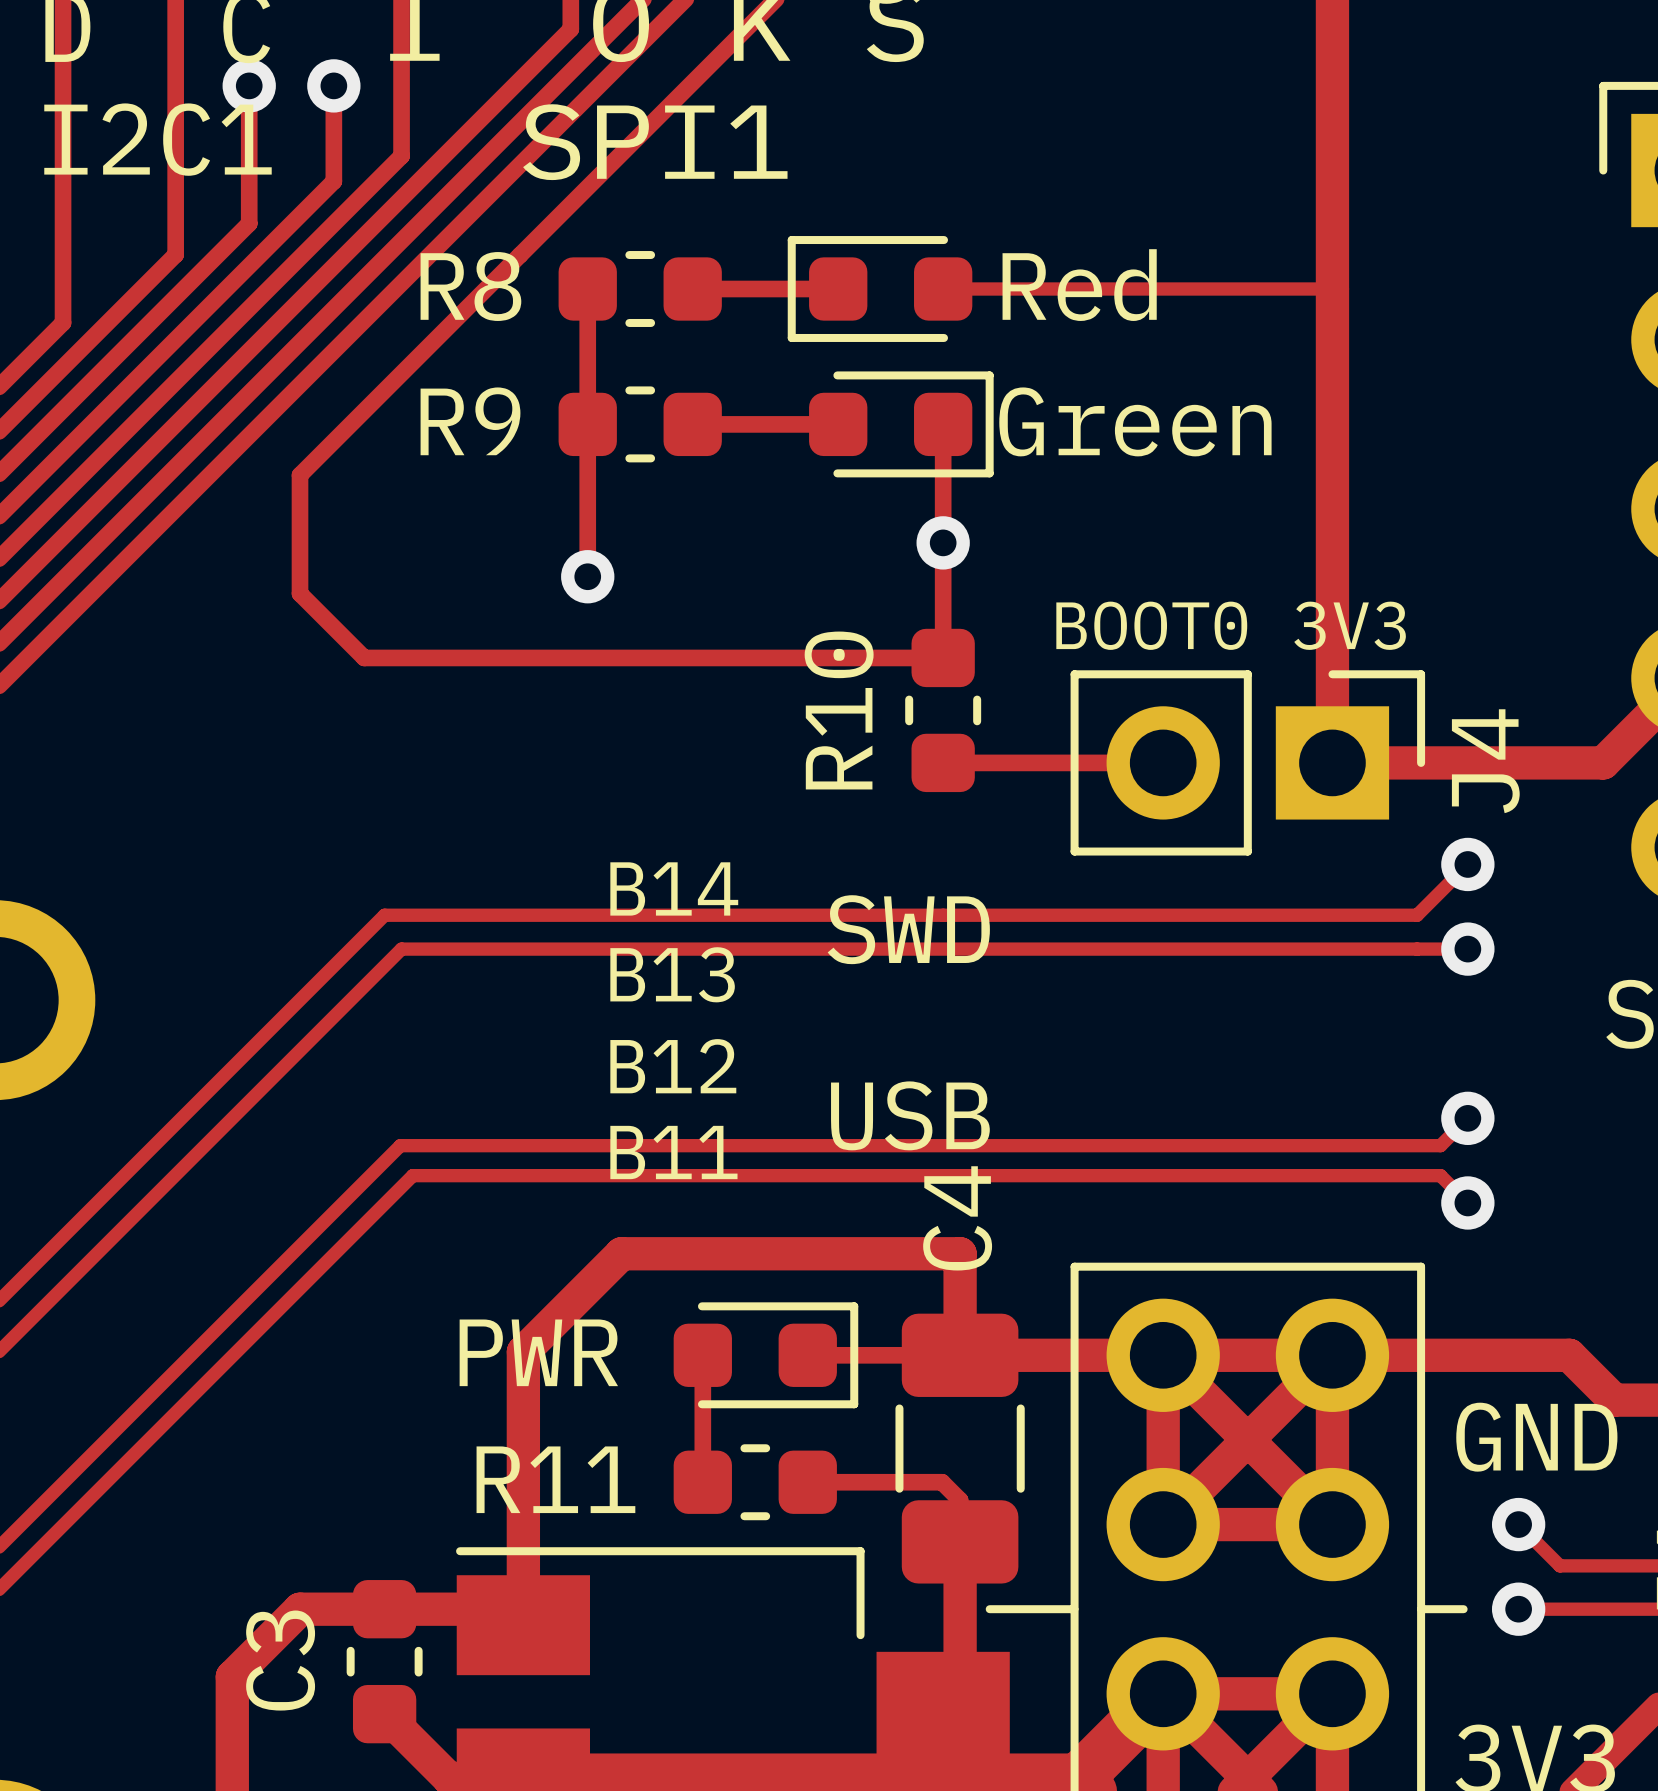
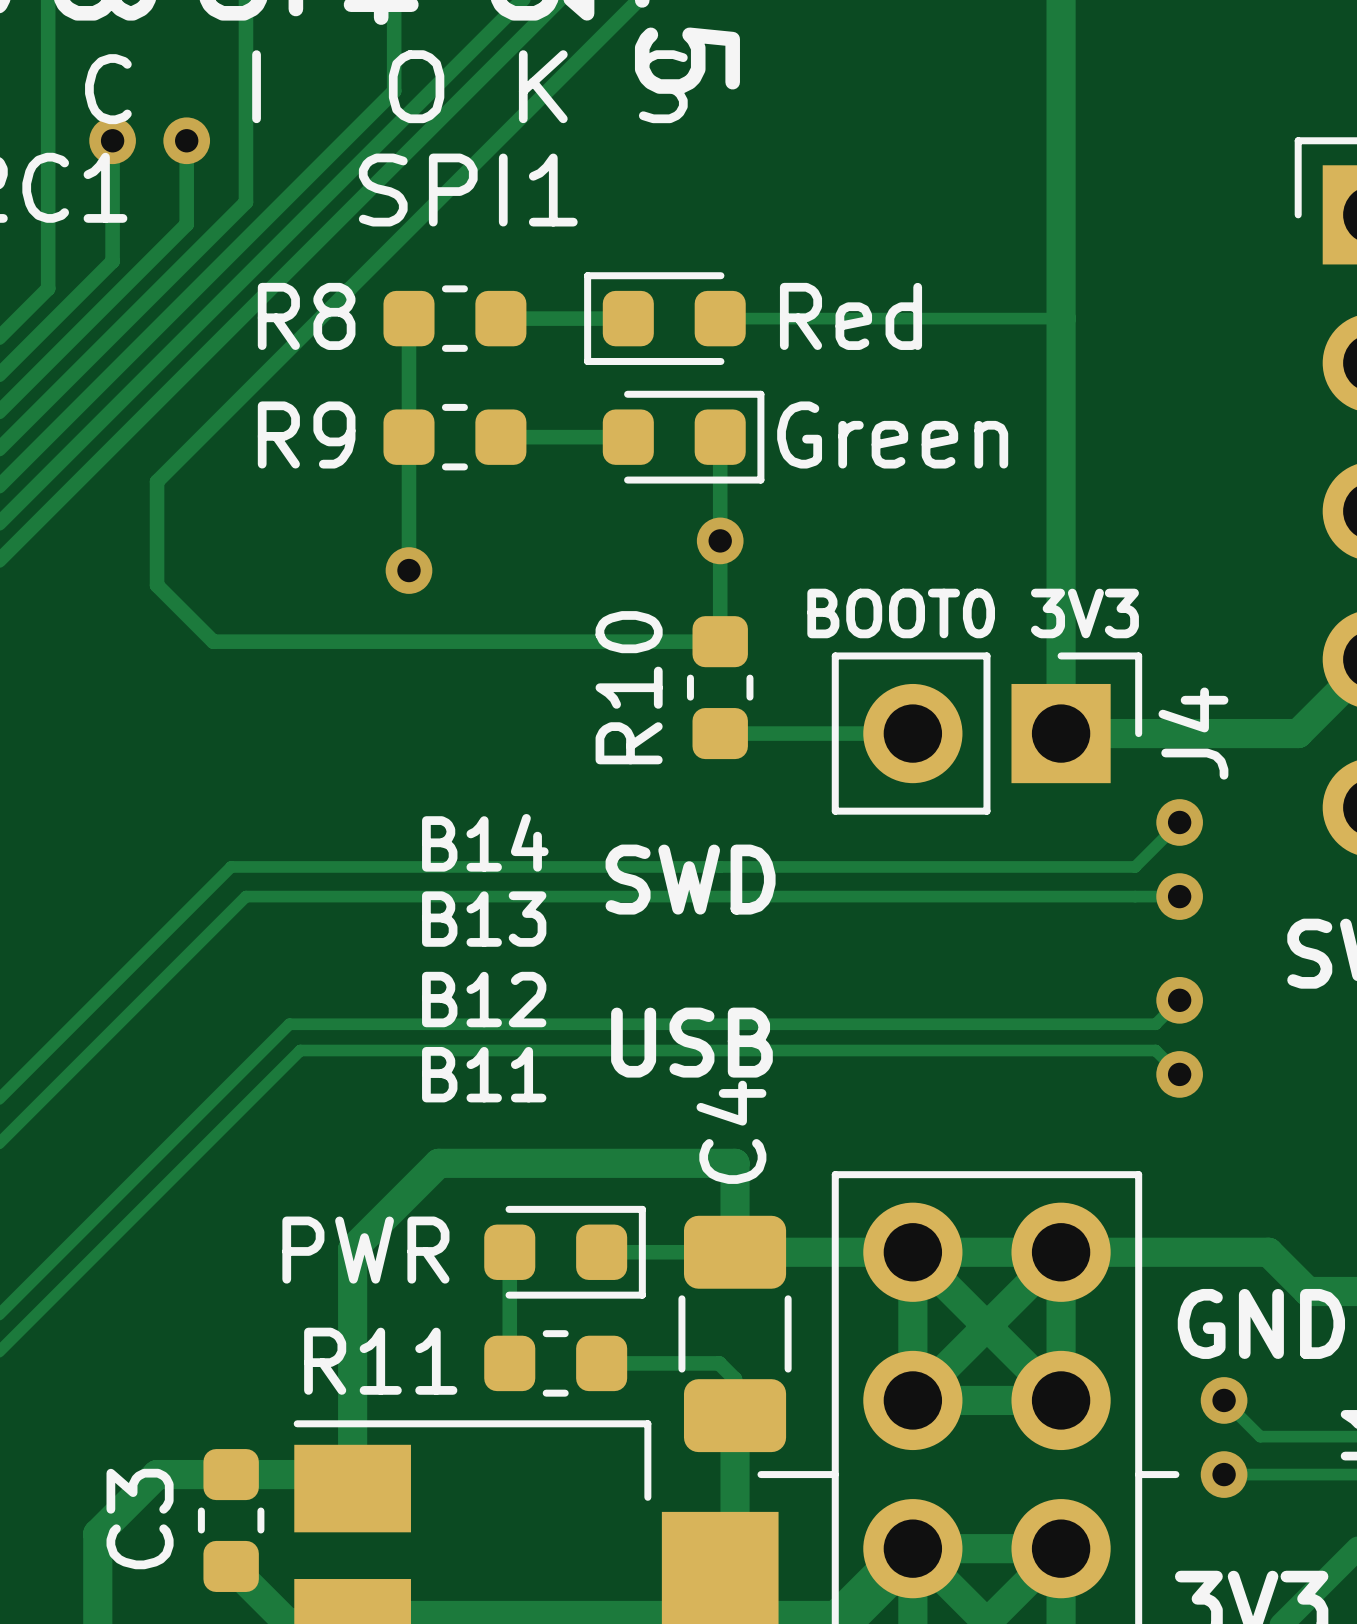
via: none -> (1179, 1000)
track: (1467, 1118) (1440, 1145) (400, 1145) -> (1179, 1000) (1155, 1024) (289, 1024) (244, 1068)
via: (1467, 1118) -> none
via: none -> (1179, 1074)
track: (412, 1175) (1440, 1175) (1467, 1202) -> (255, 1094) (300, 1050) (1155, 1050) (1179, 1074)
via: (1467, 1202) -> none

